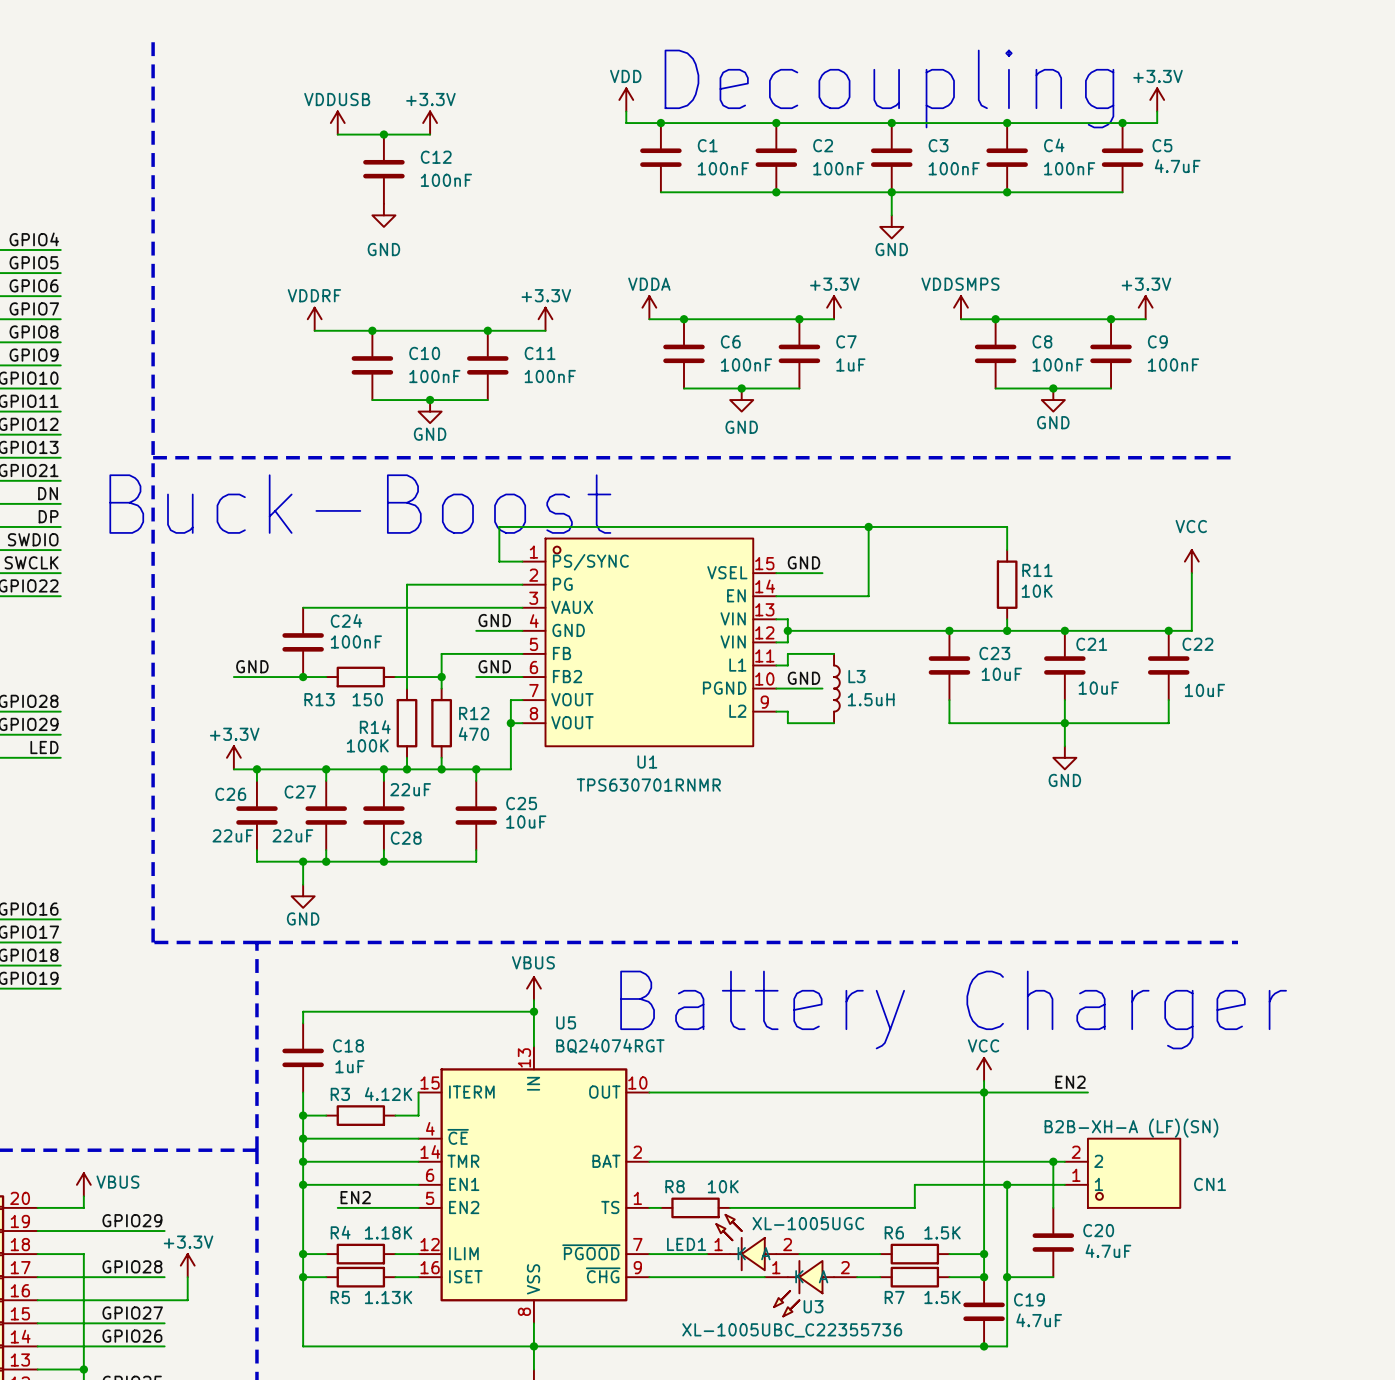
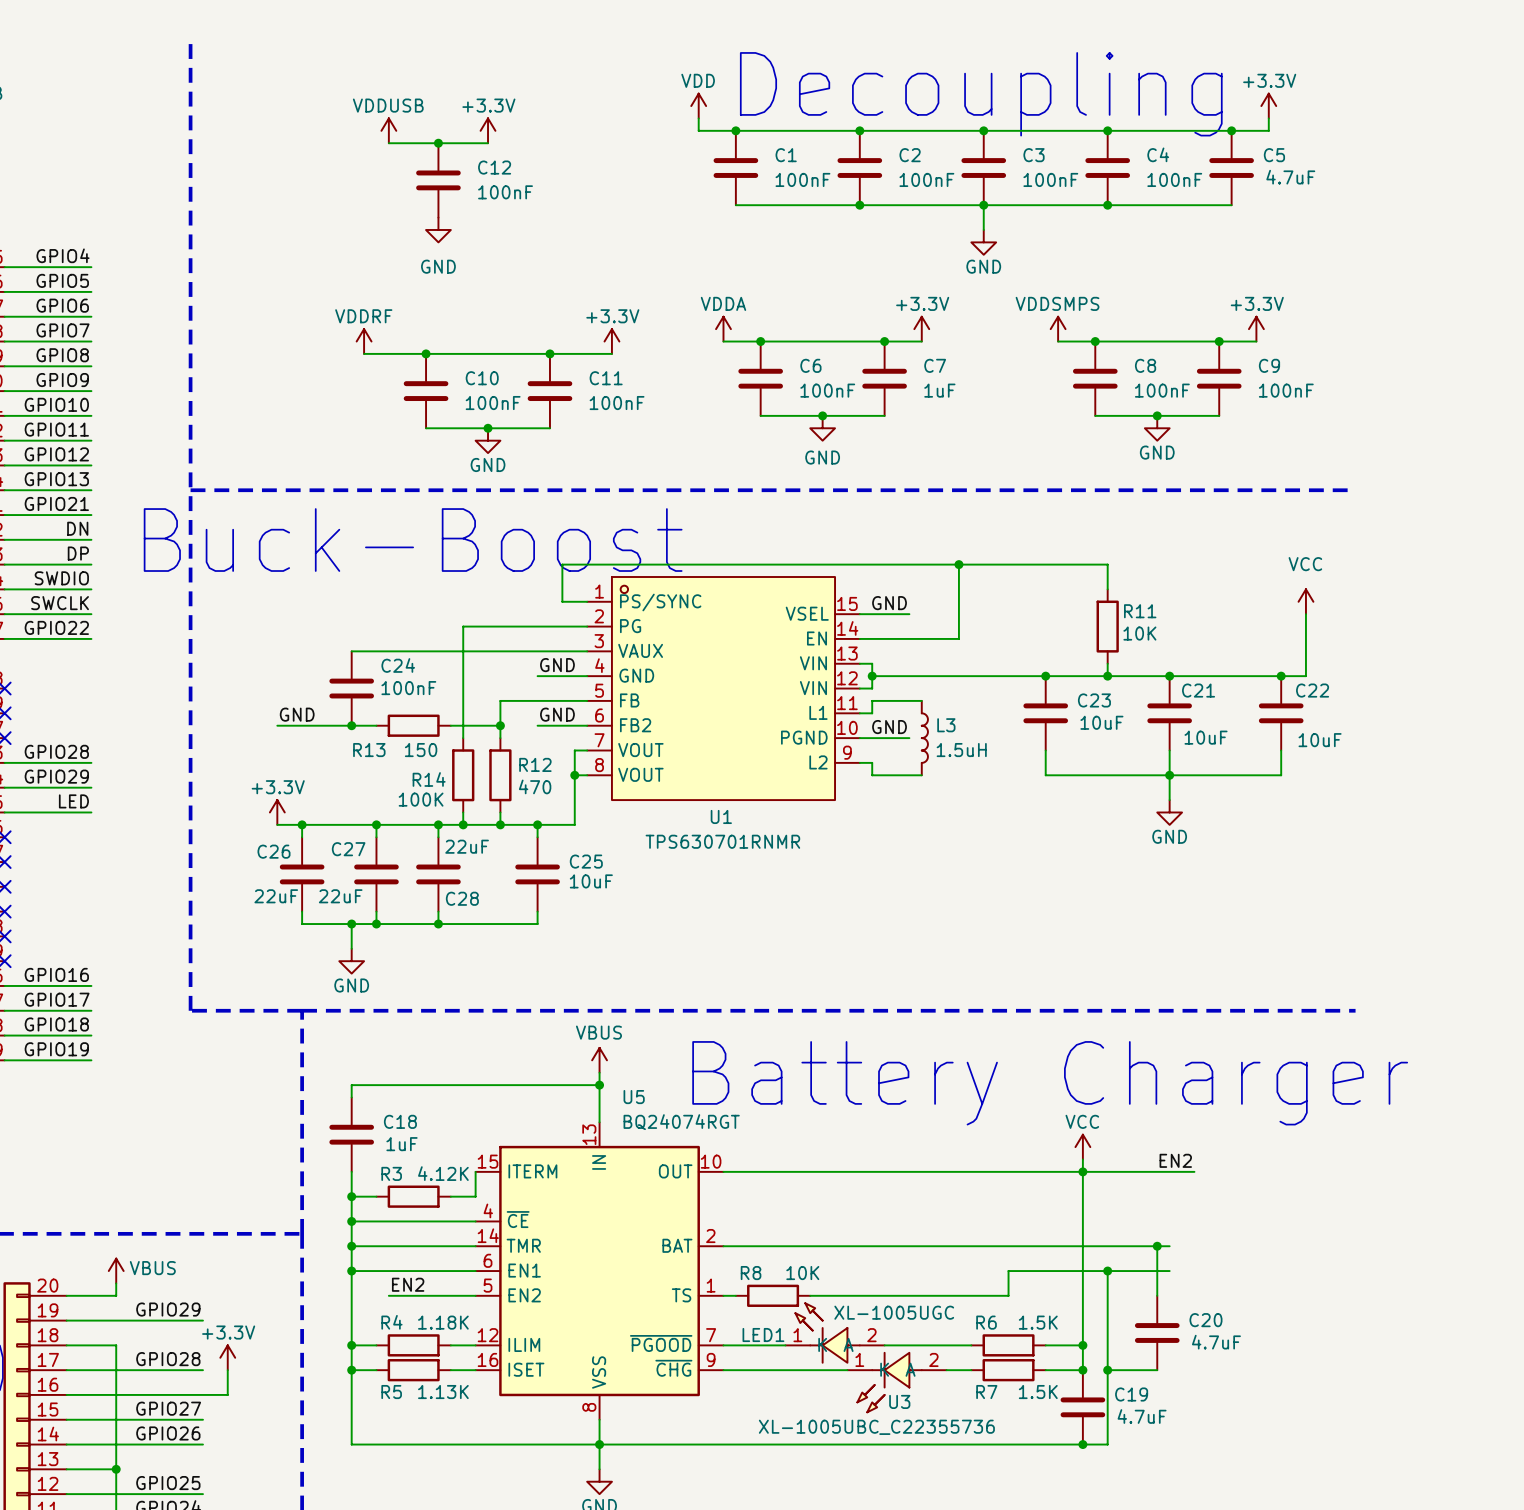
CN1: B2B-XH-A (LF)(SN) (1122, 1173) -> none

